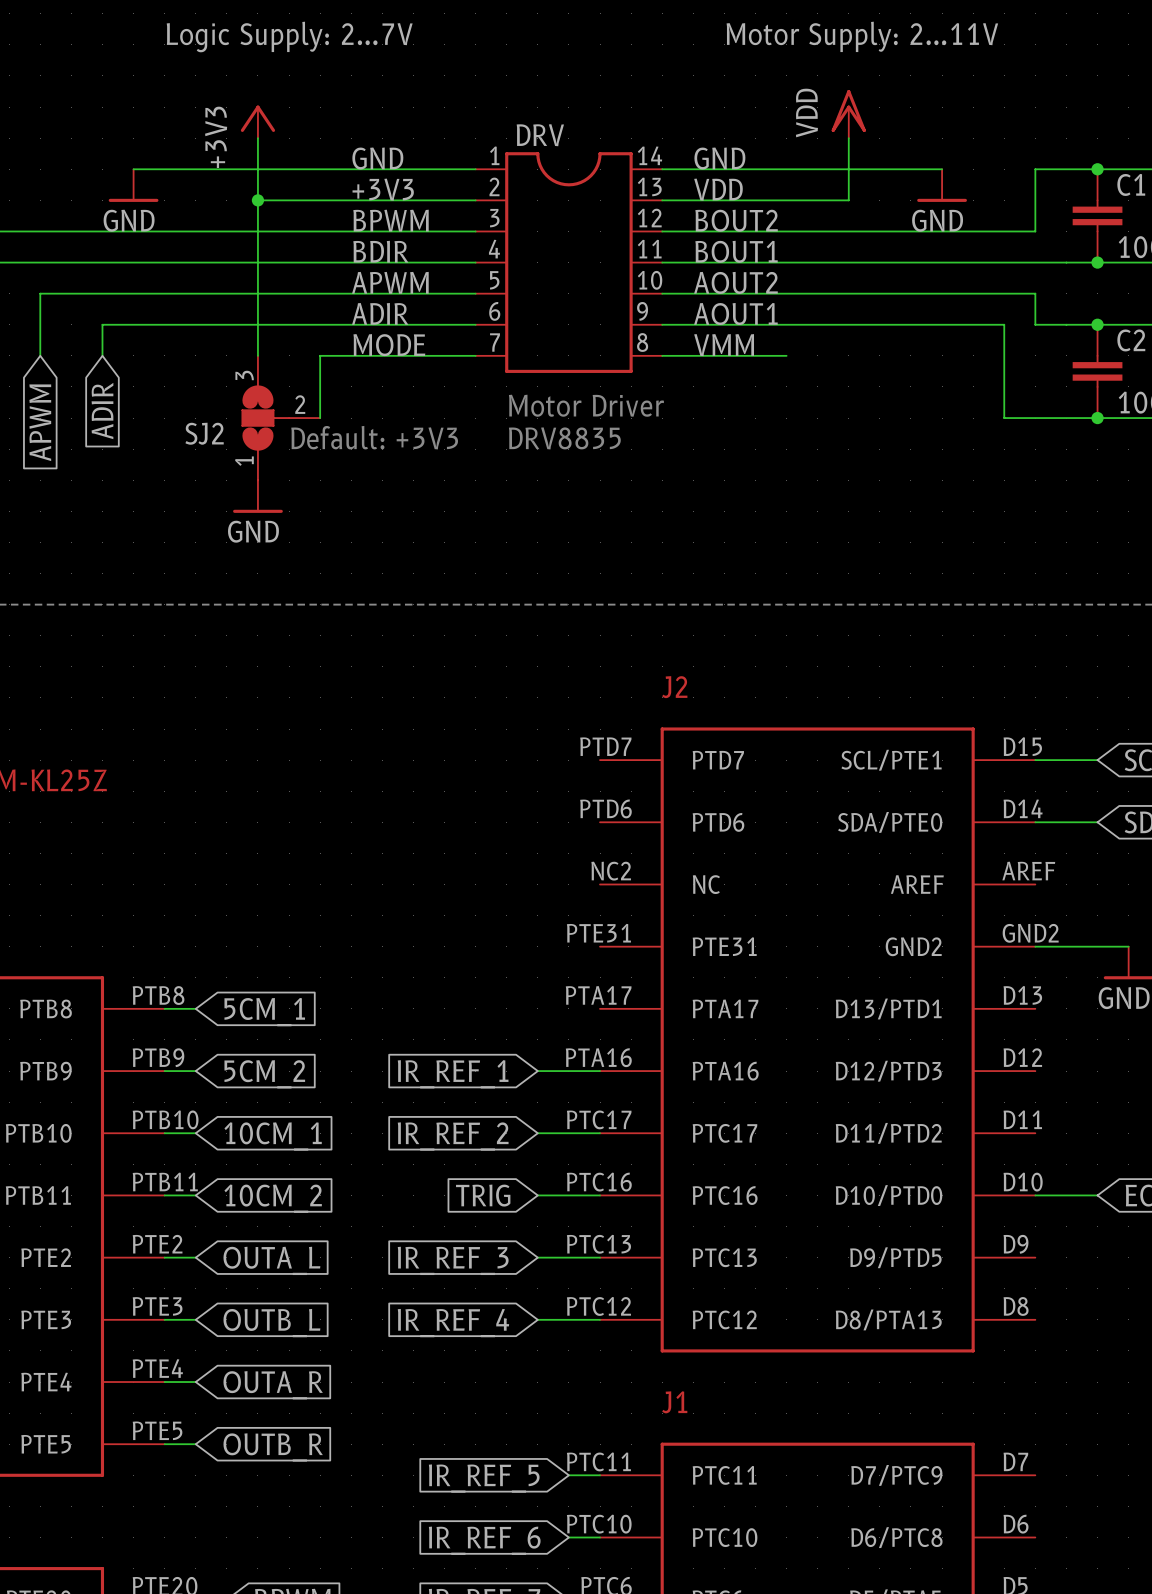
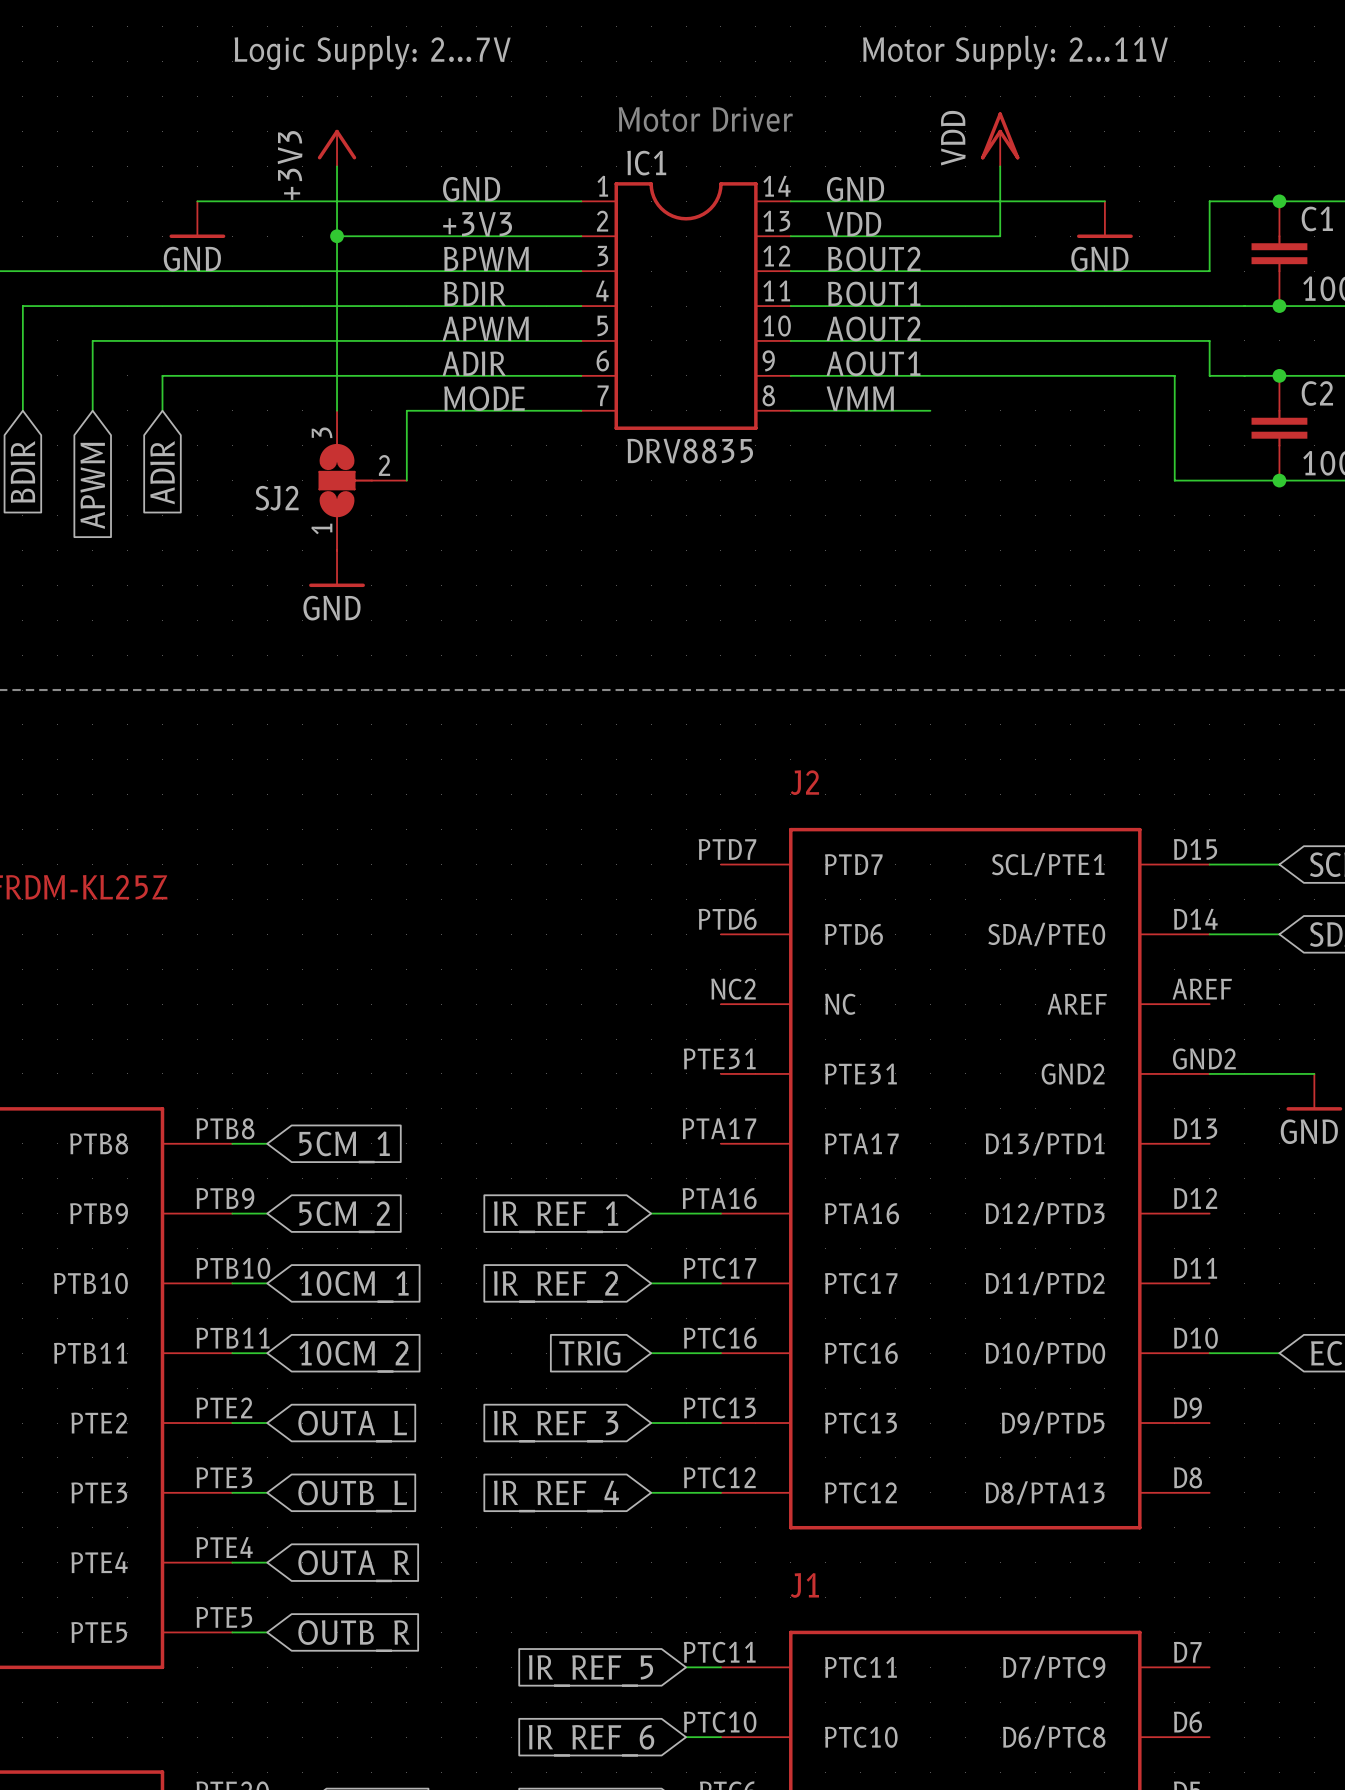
text: none -> Motor Driver (705, 119)
DRV name: DRV (540, 135) -> IC1 (646, 163)
DRV value: none -> DRV8835 (690, 451)
text: Motor Driver (586, 405) -> none
text: Default: +3V3 (374, 437) -> none
text: DRV8835 (564, 438) -> none

